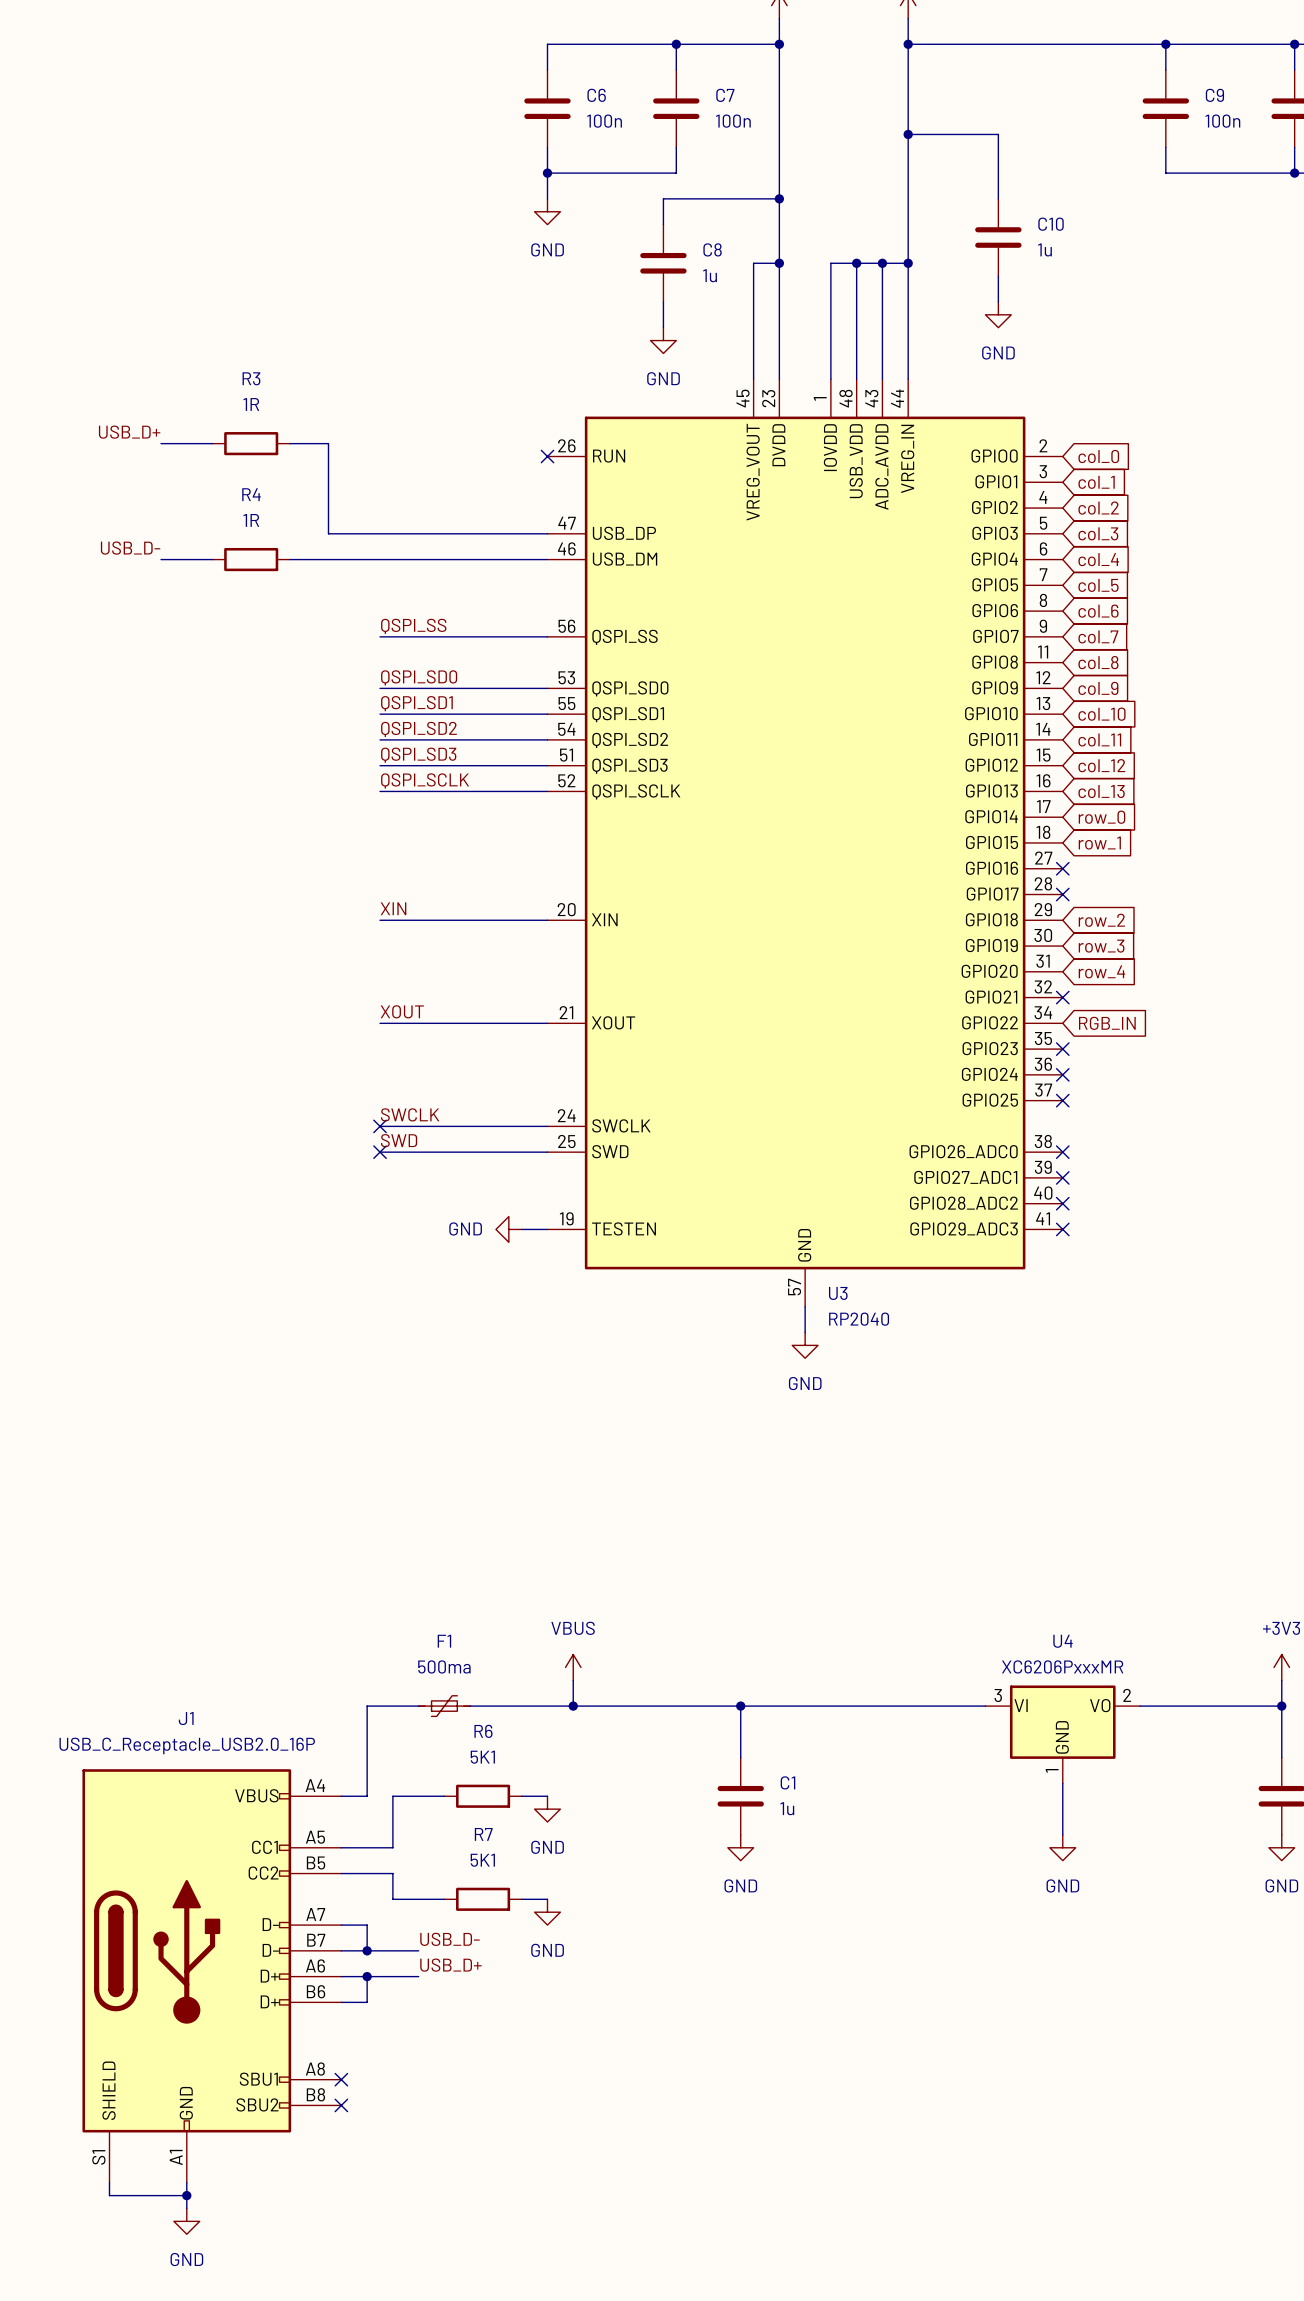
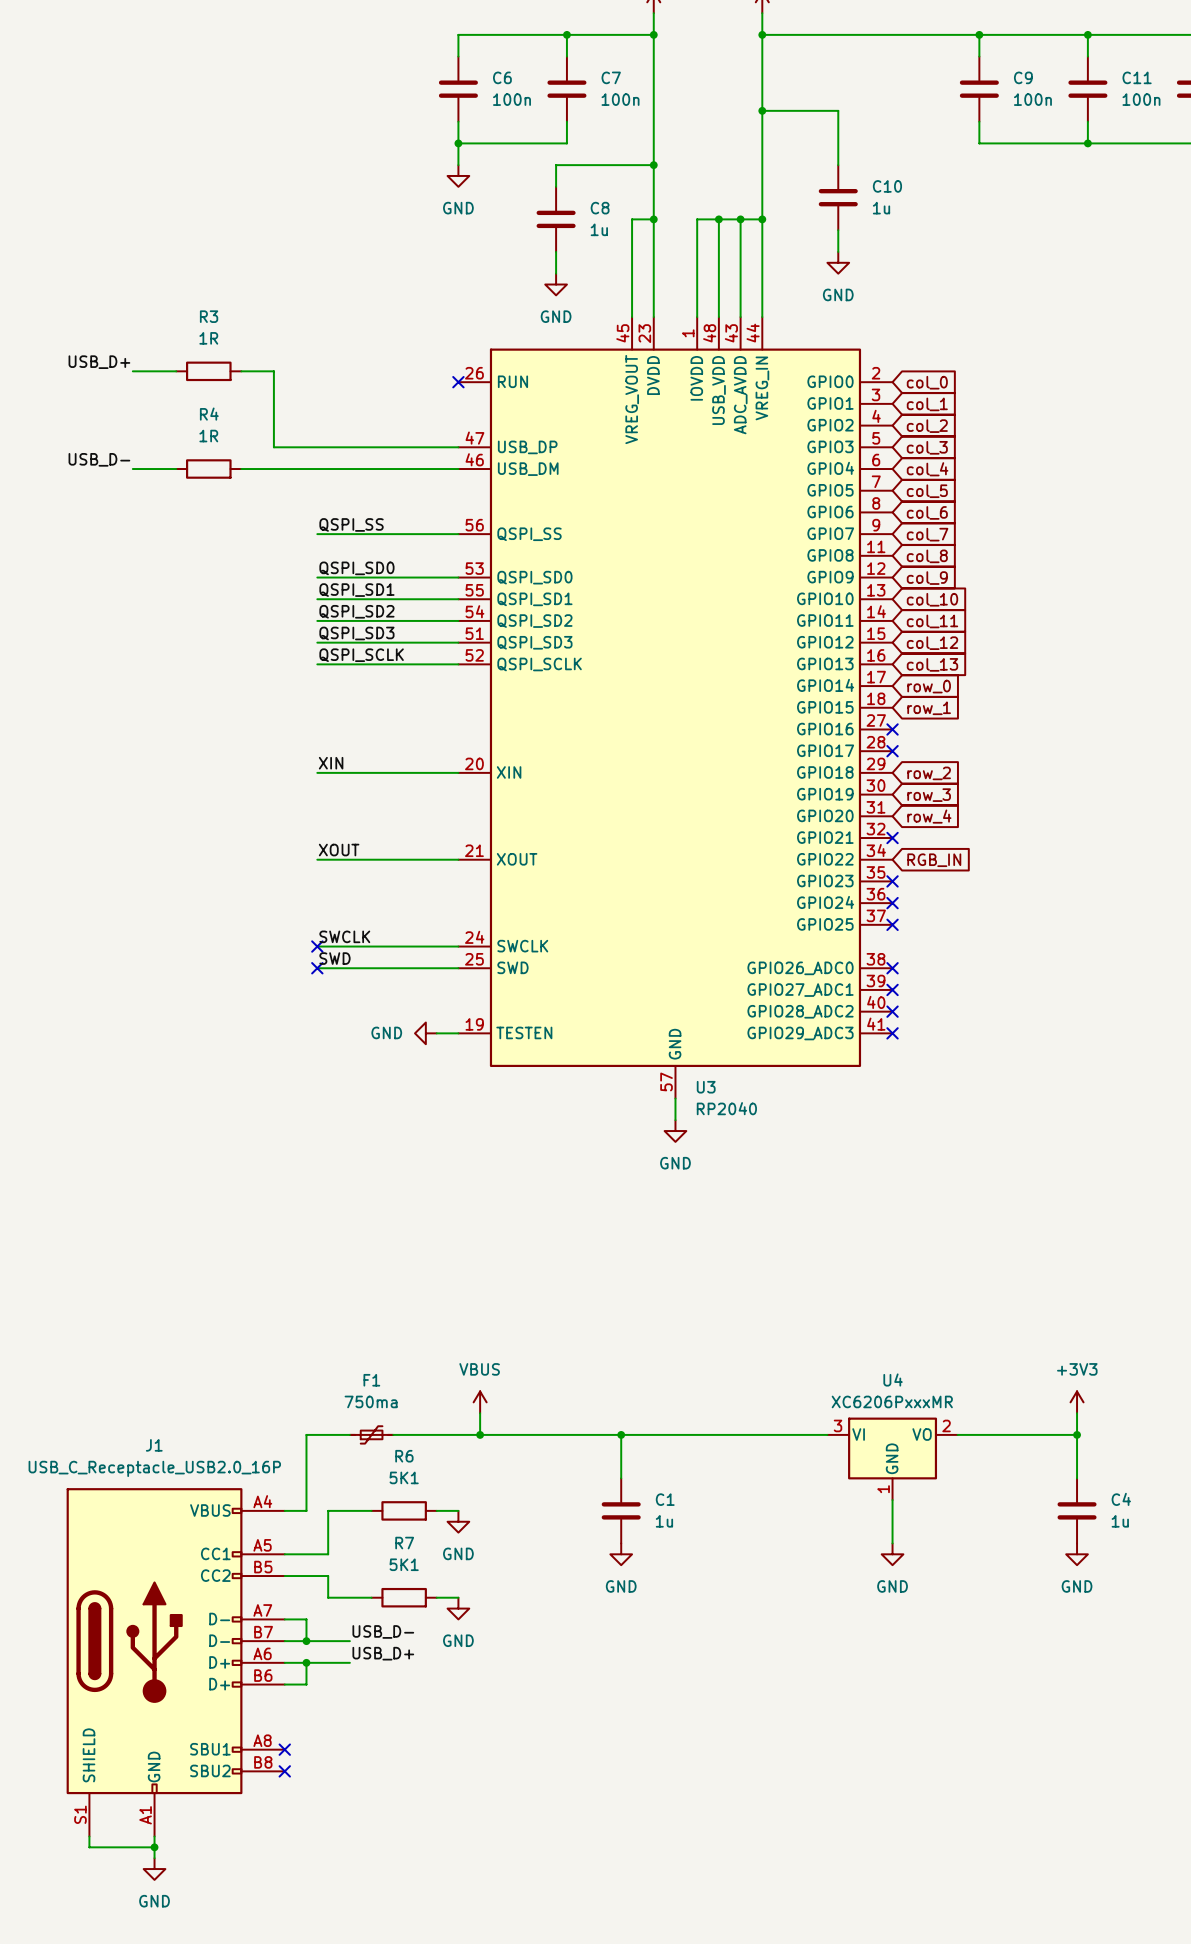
F1 value: 500ma (444, 1666) -> 750ma (371, 1401)

